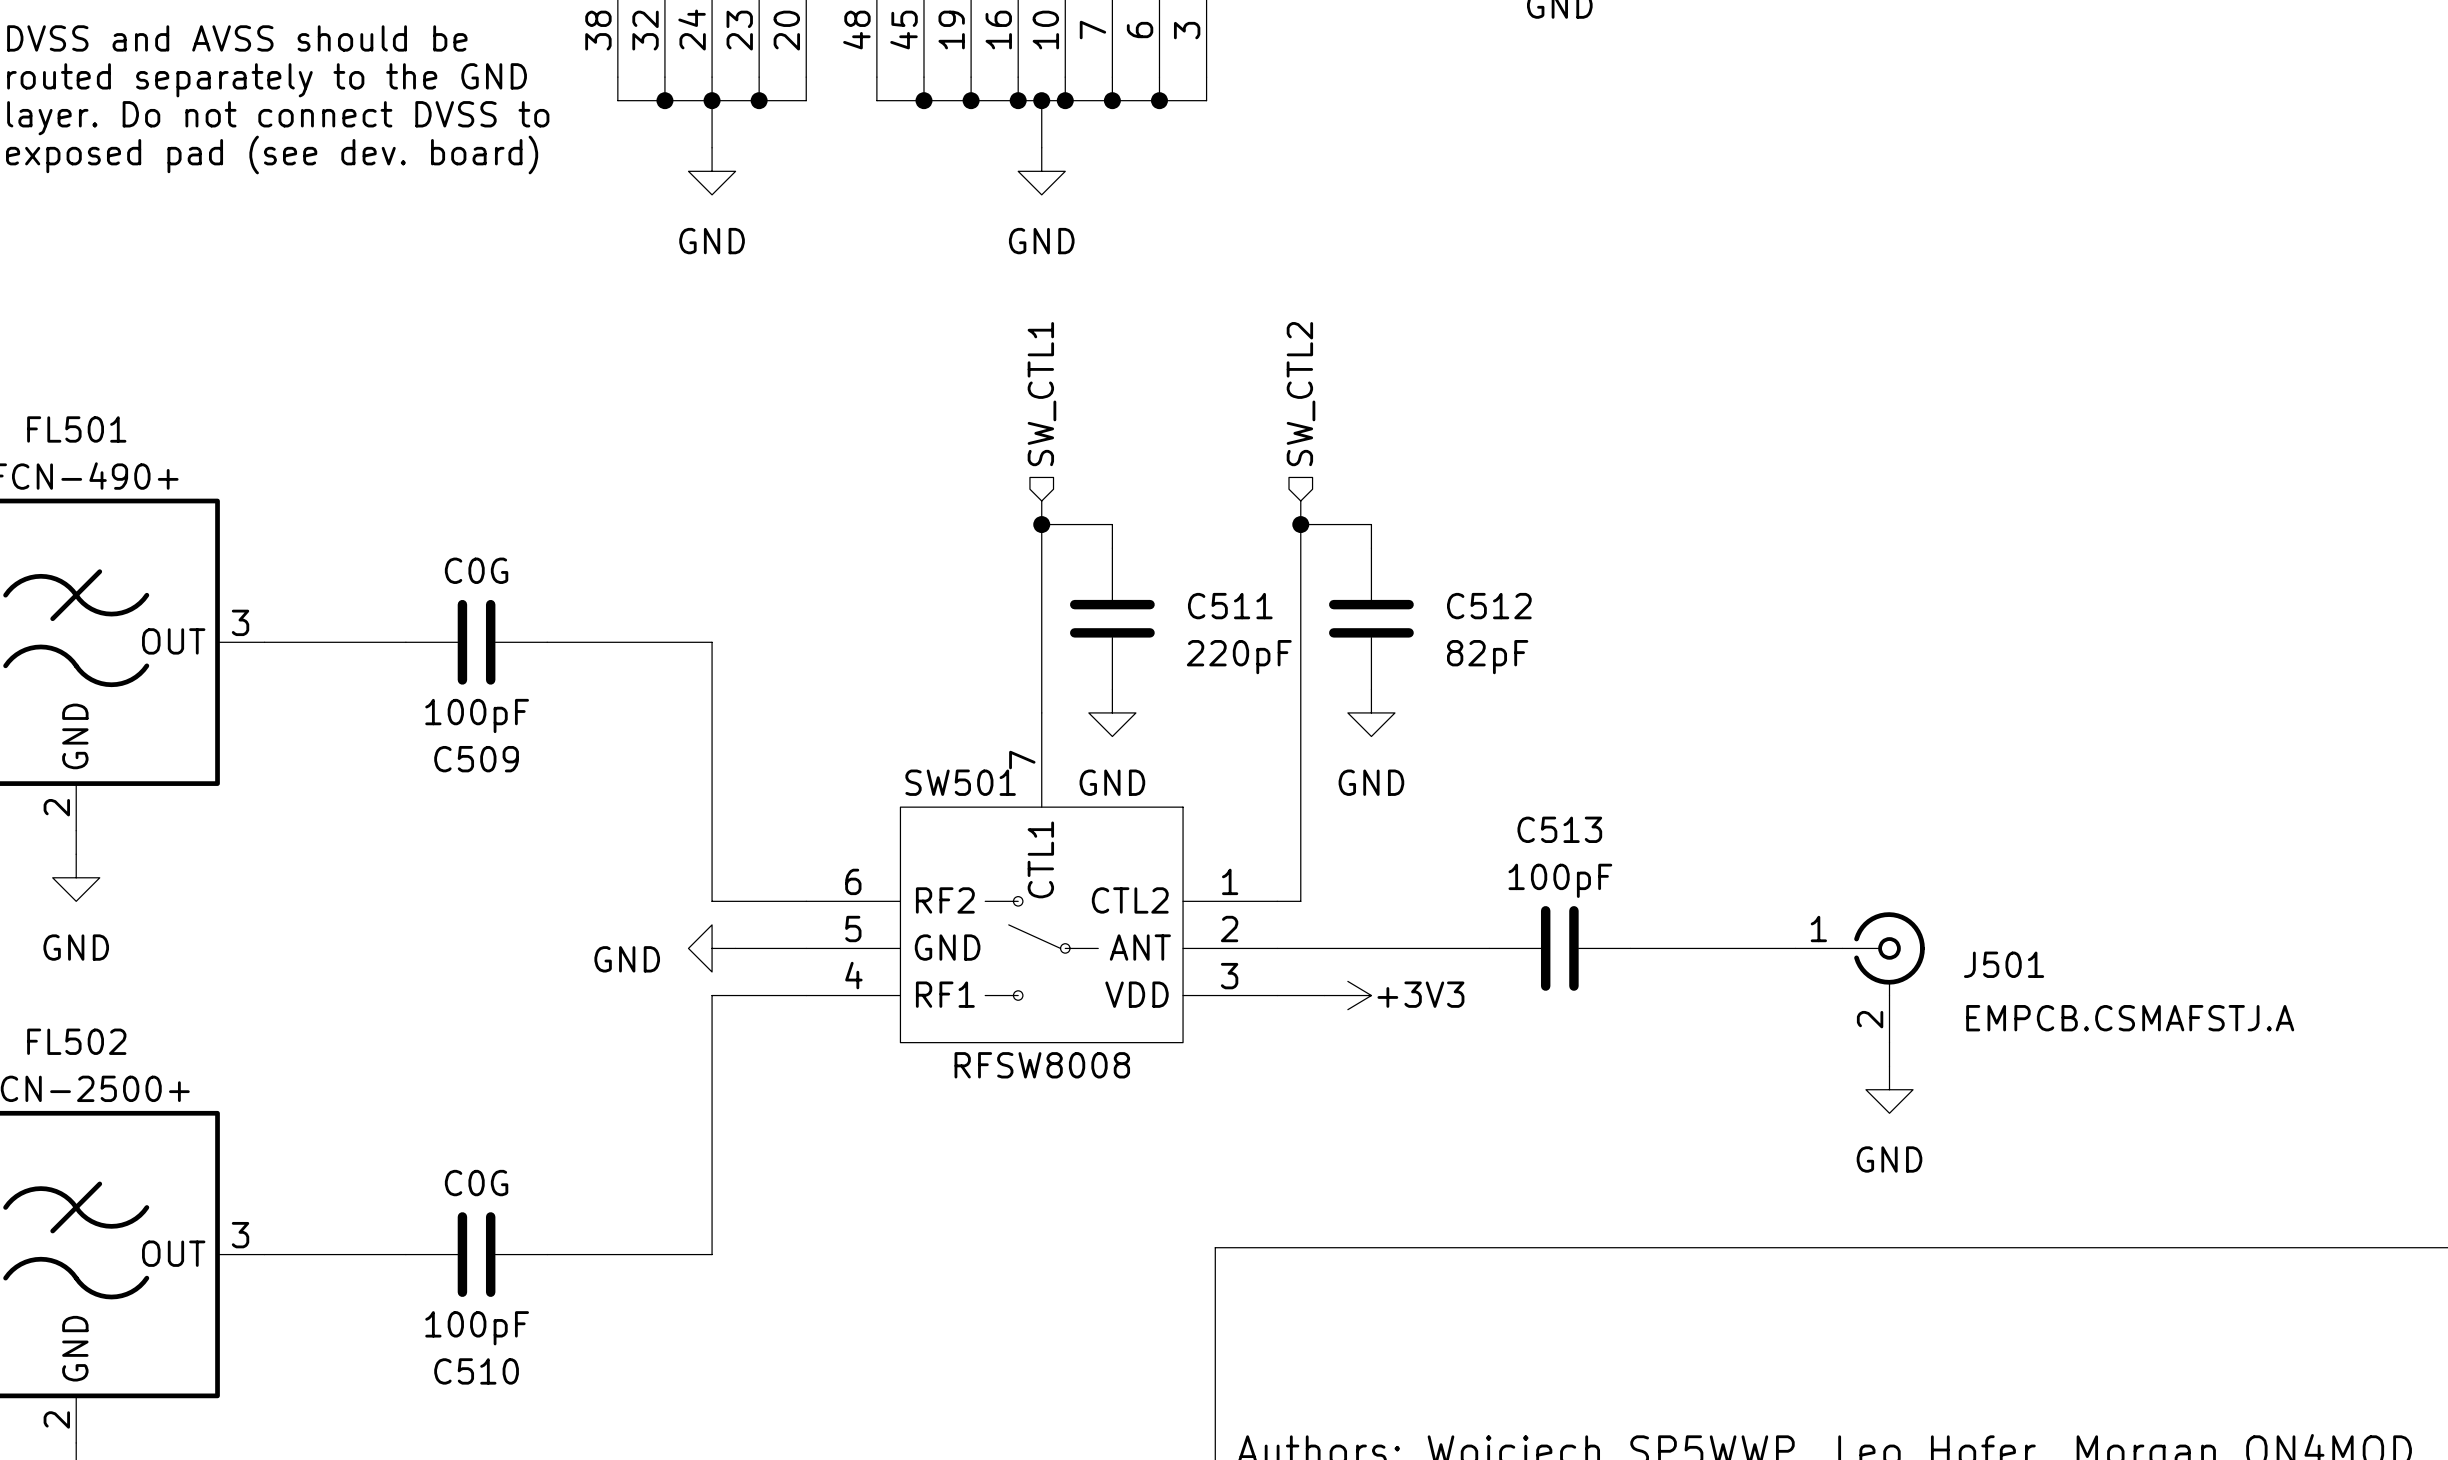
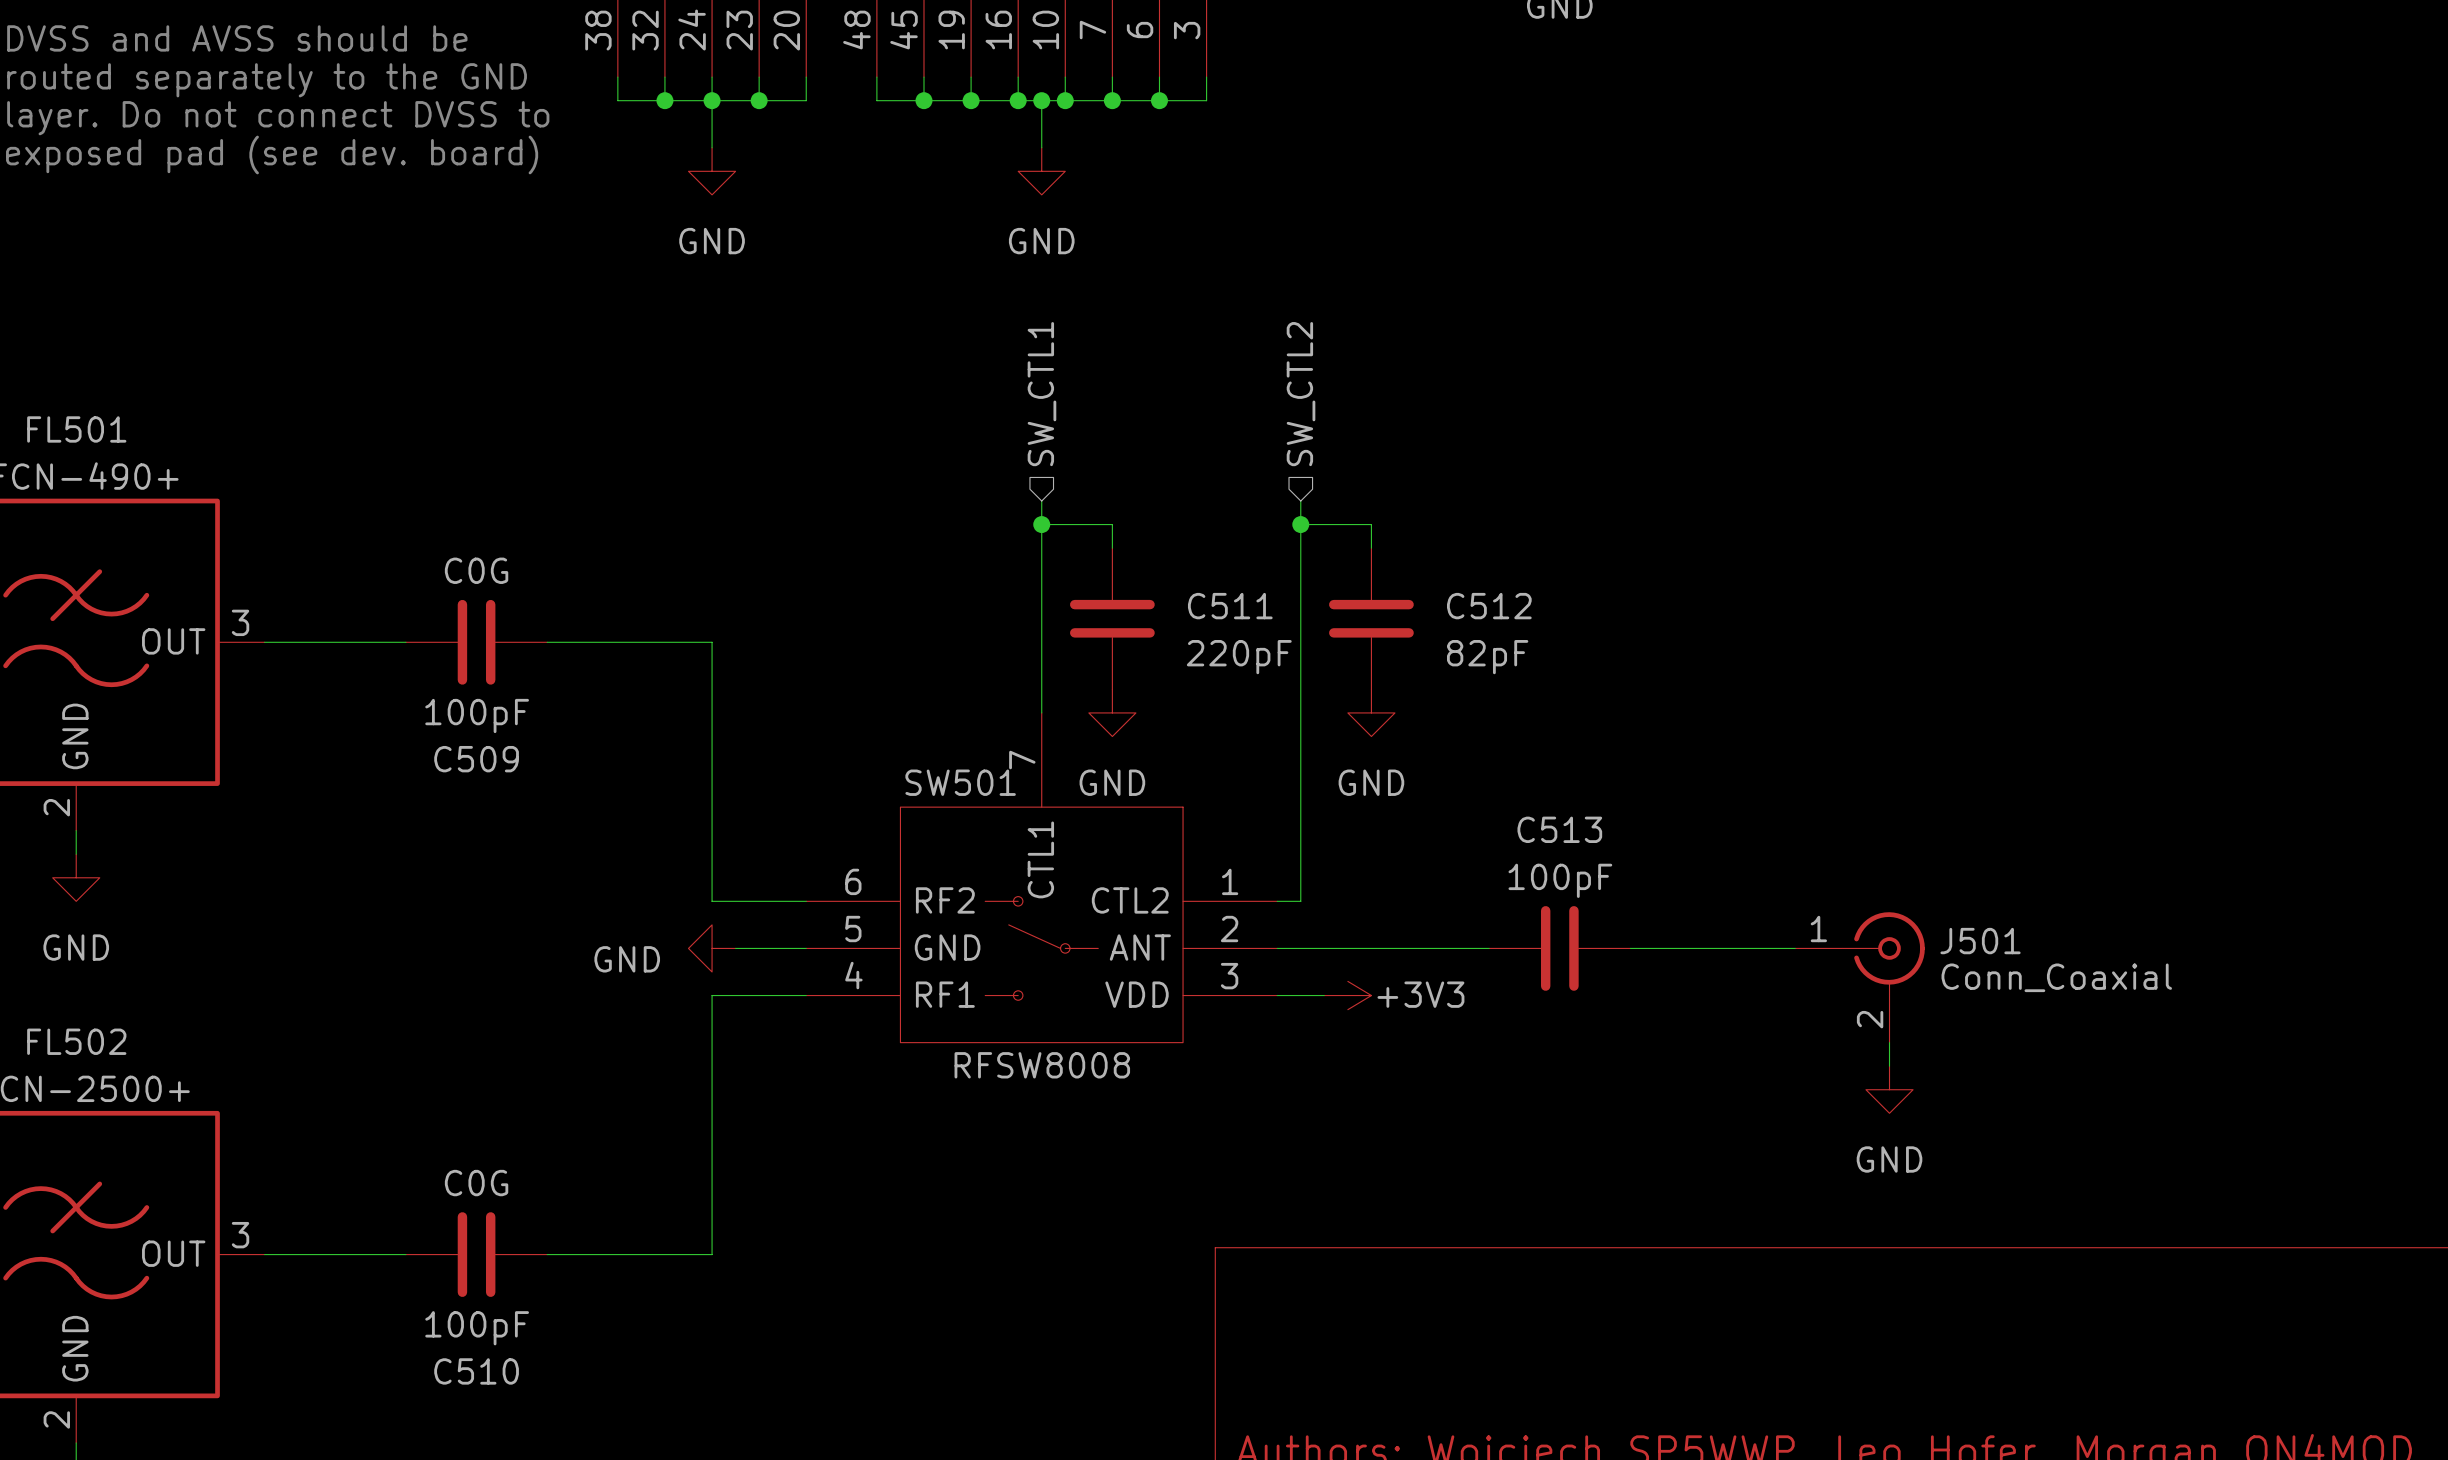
J501 name position: J501 (2004, 964) -> J501 (1980, 941)
J501 value: EMPCB.CSMAFSTJ.A (2130, 1018) -> Conn_Coaxial (2056, 977)

